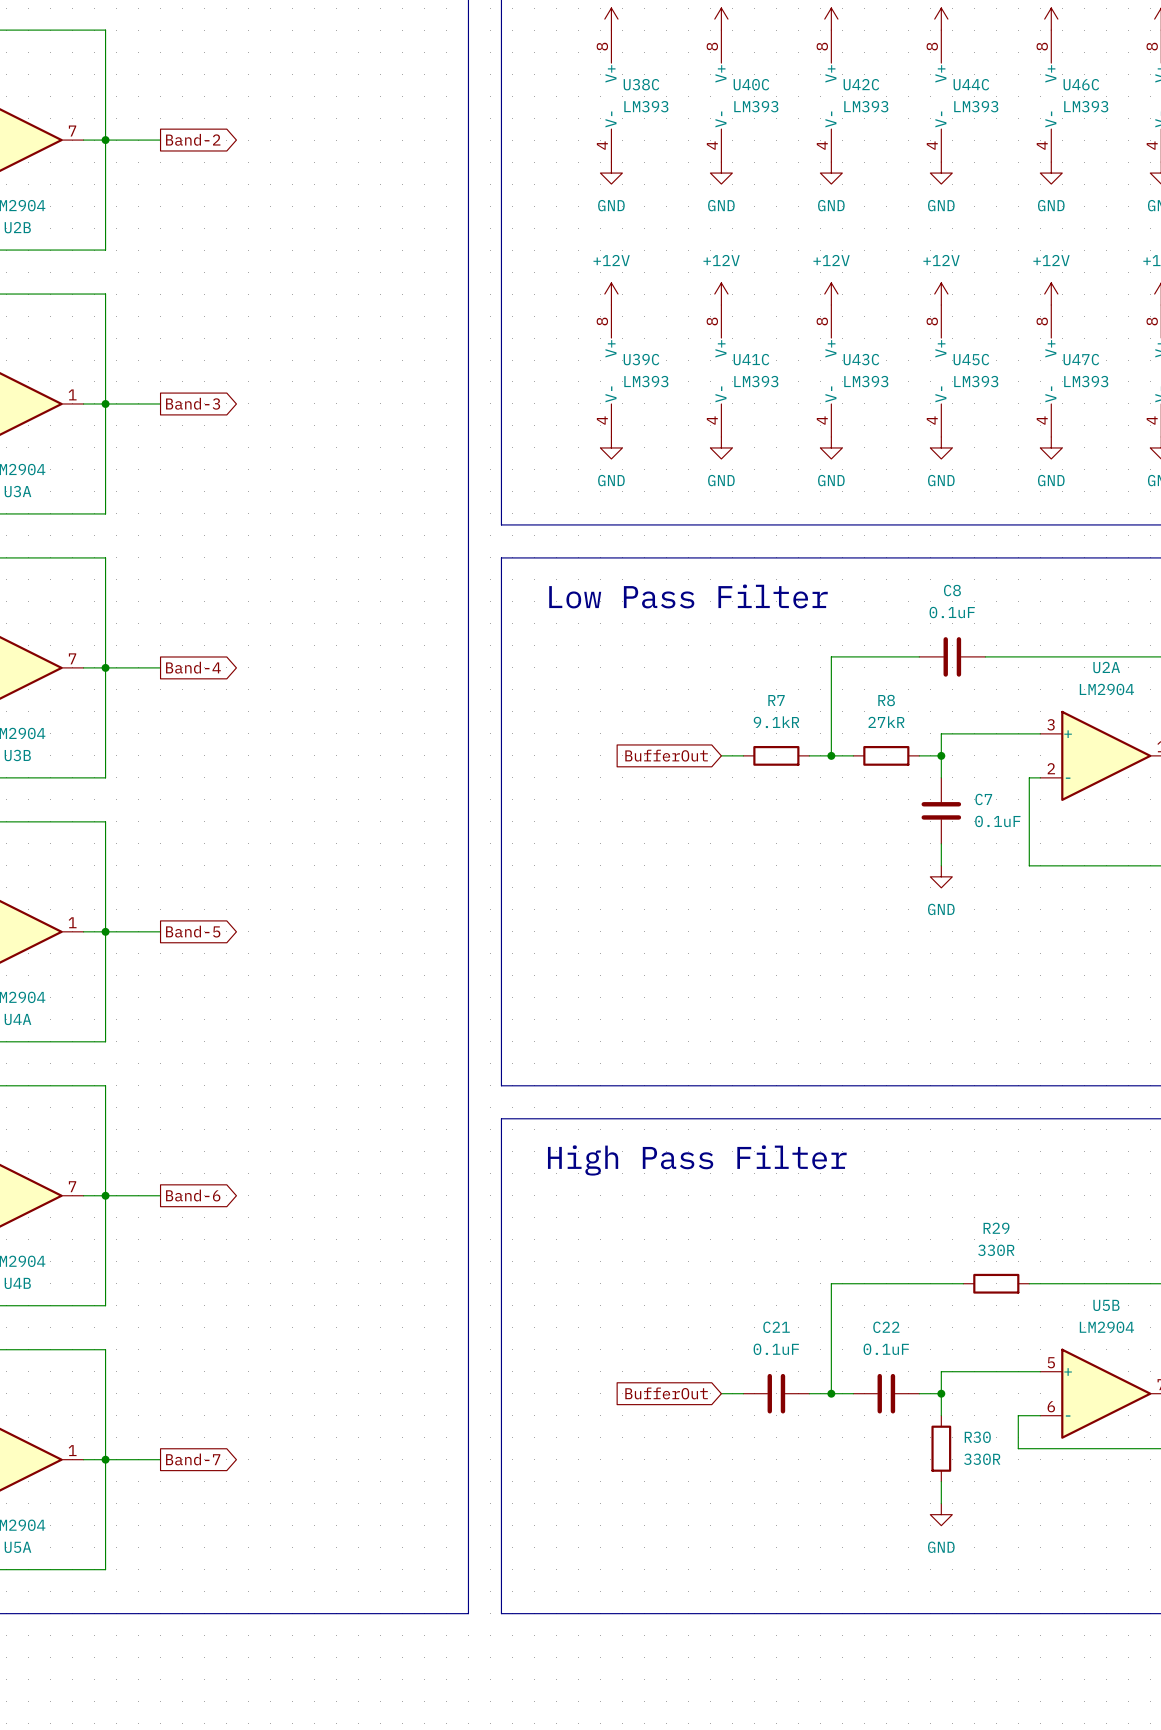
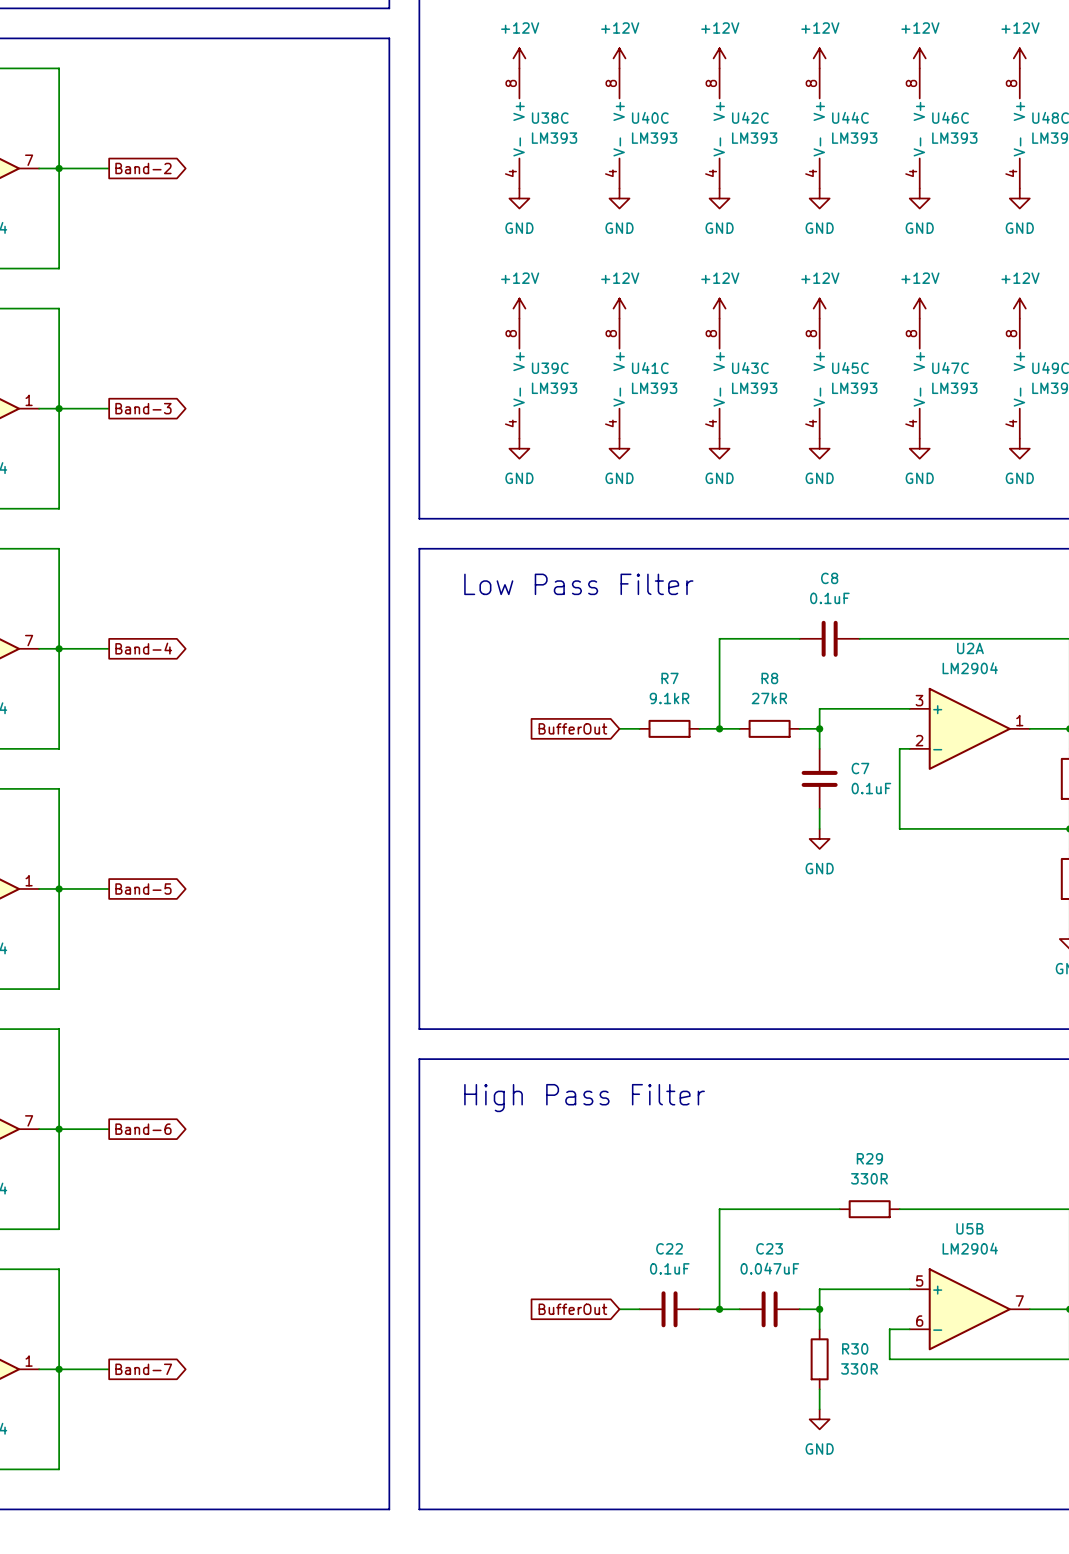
C21 name: C21 (776, 1327) -> C22 (669, 1248)
C22 name: C22 (886, 1327) -> C23 (769, 1248)
C22 value: 0.1uF (886, 1349) -> 0.047uF (769, 1268)

